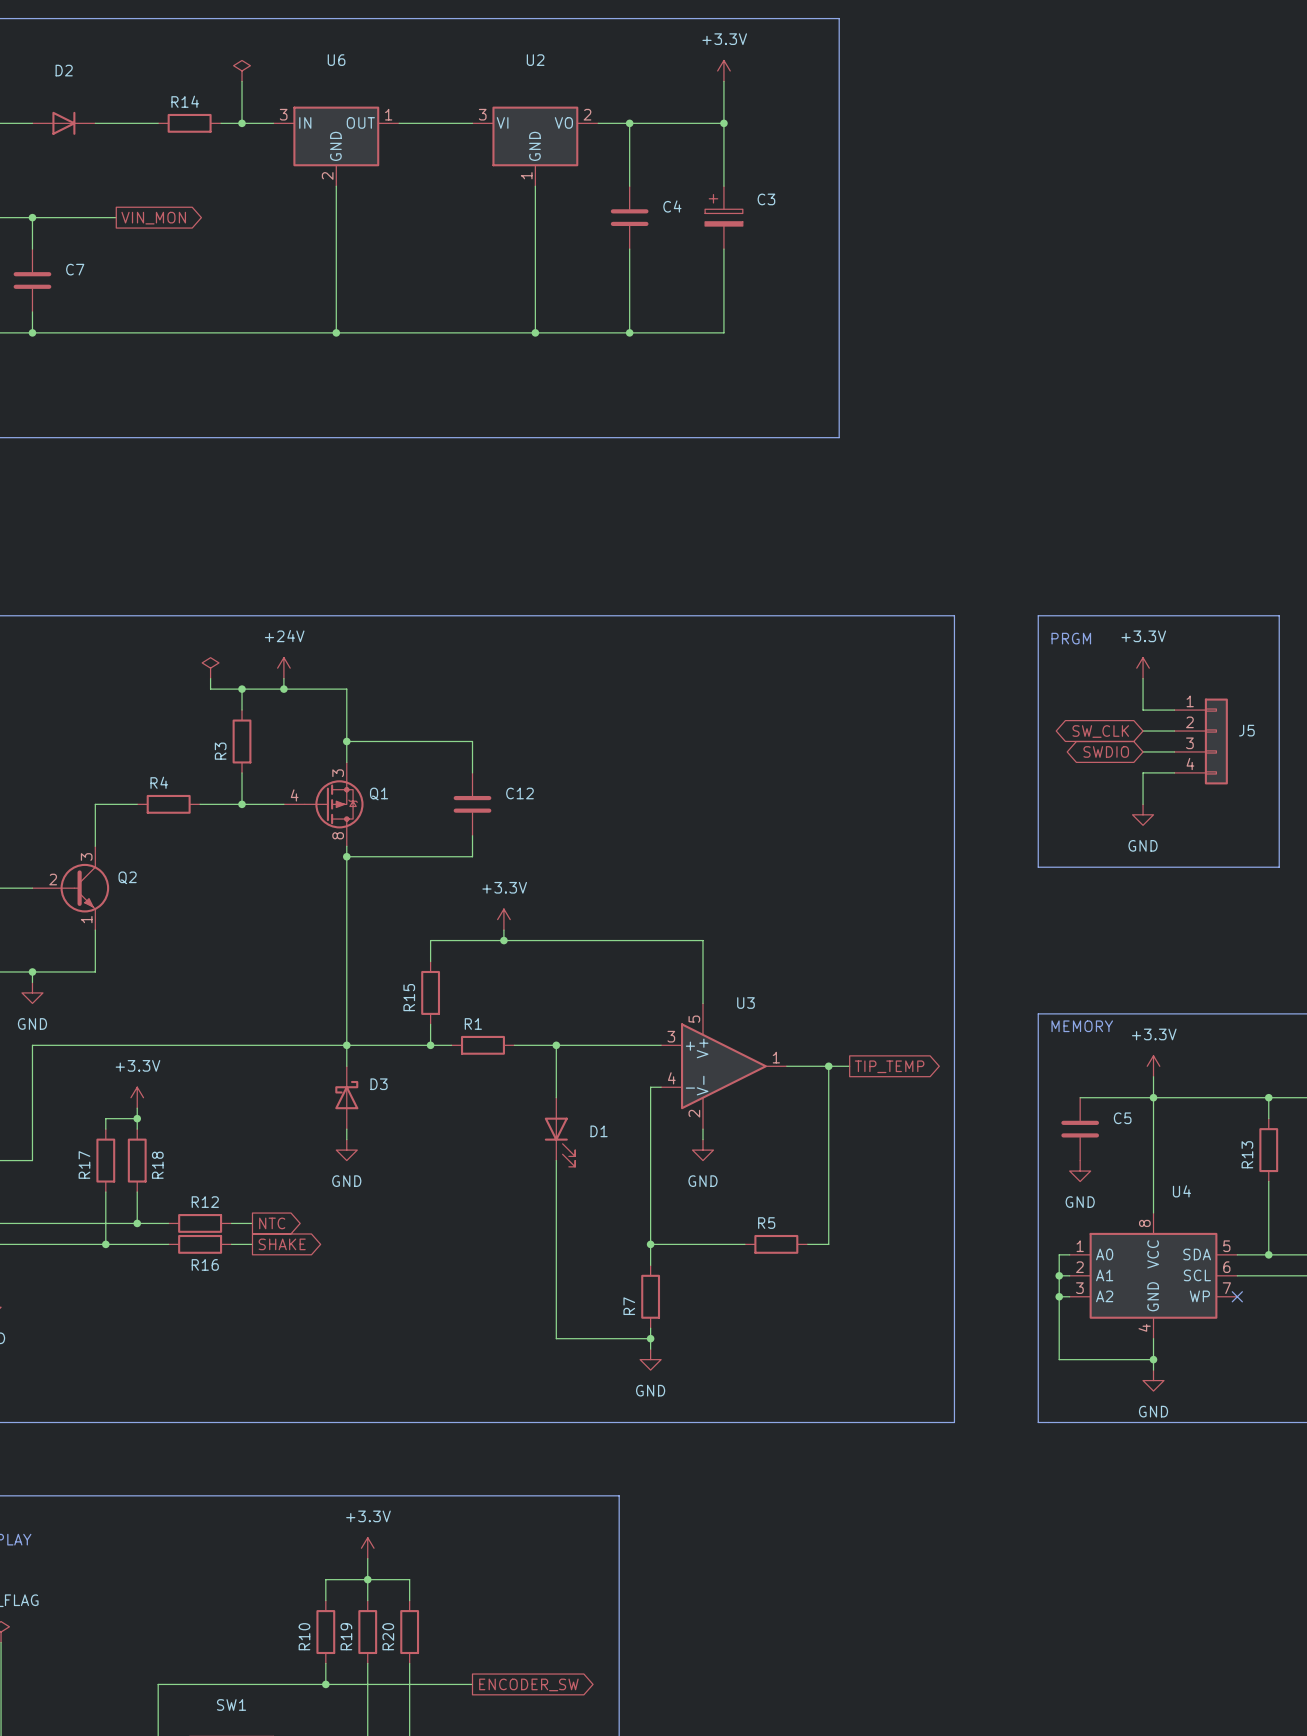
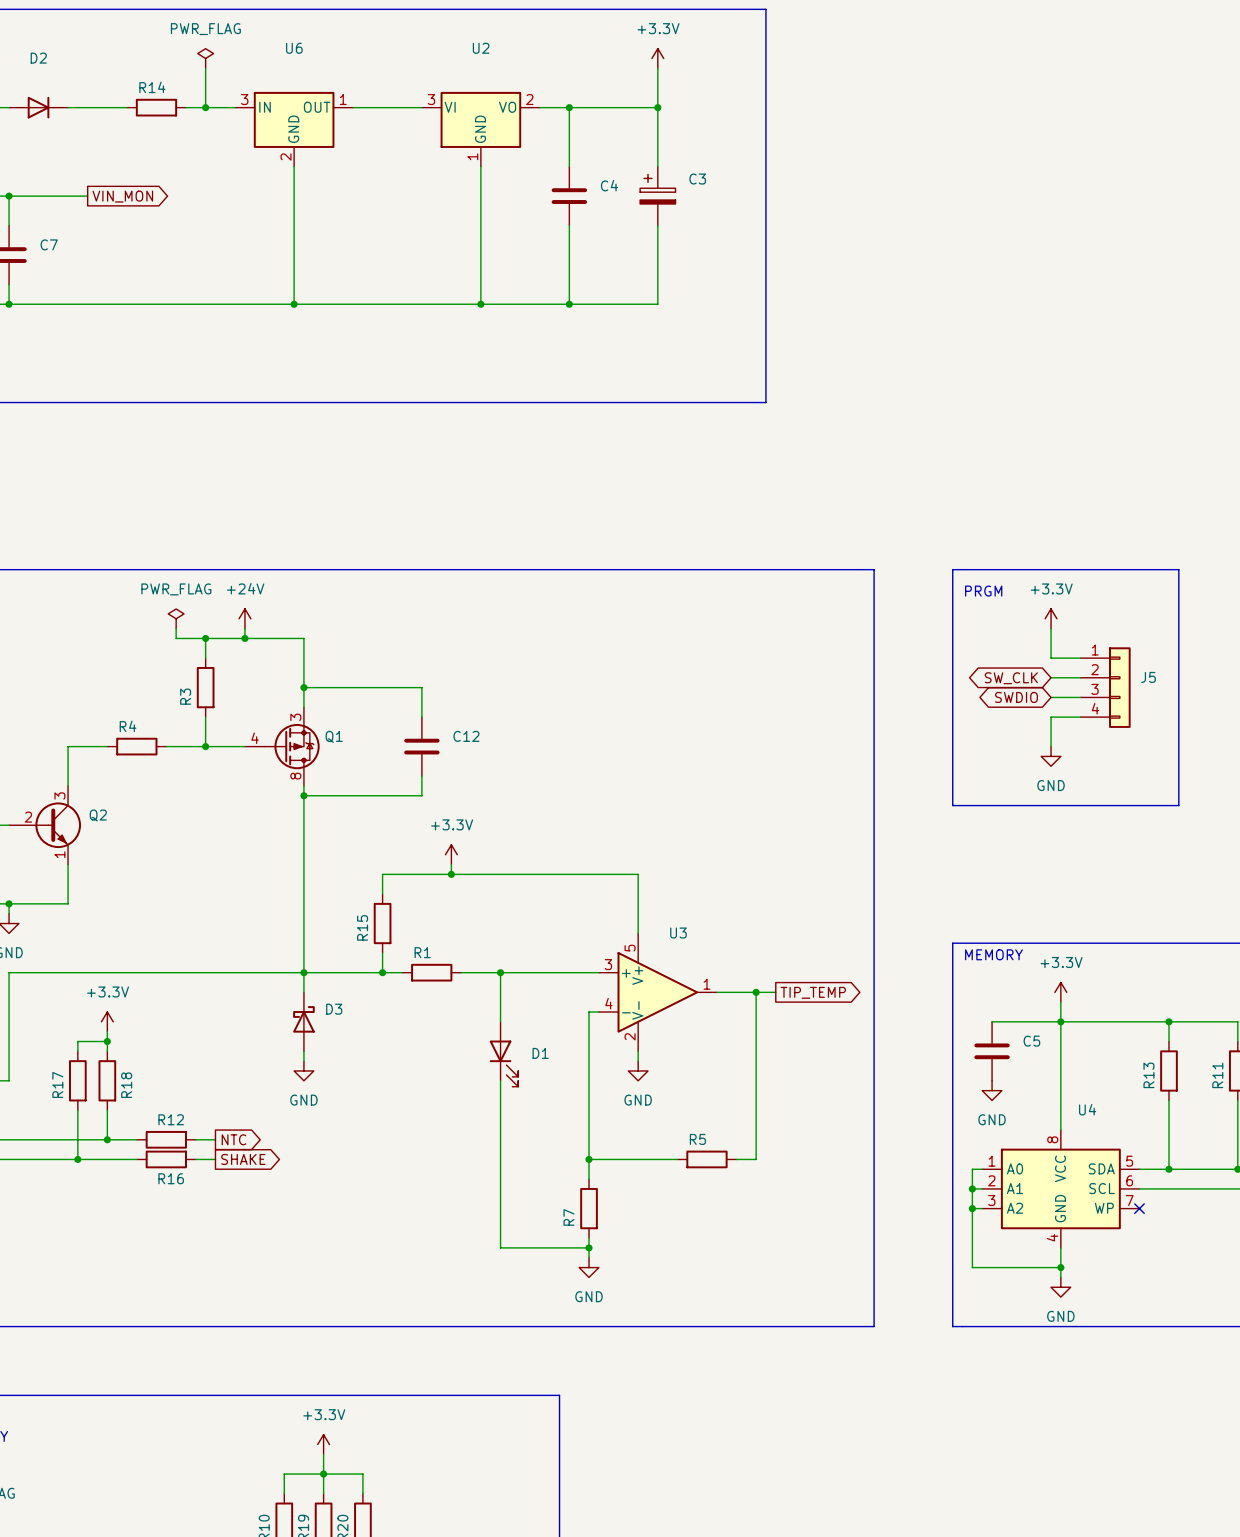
power symbol text: none -> PWR_FLAG (205, 29)
power symbol text: none -> PWR_FLAG (176, 589)

